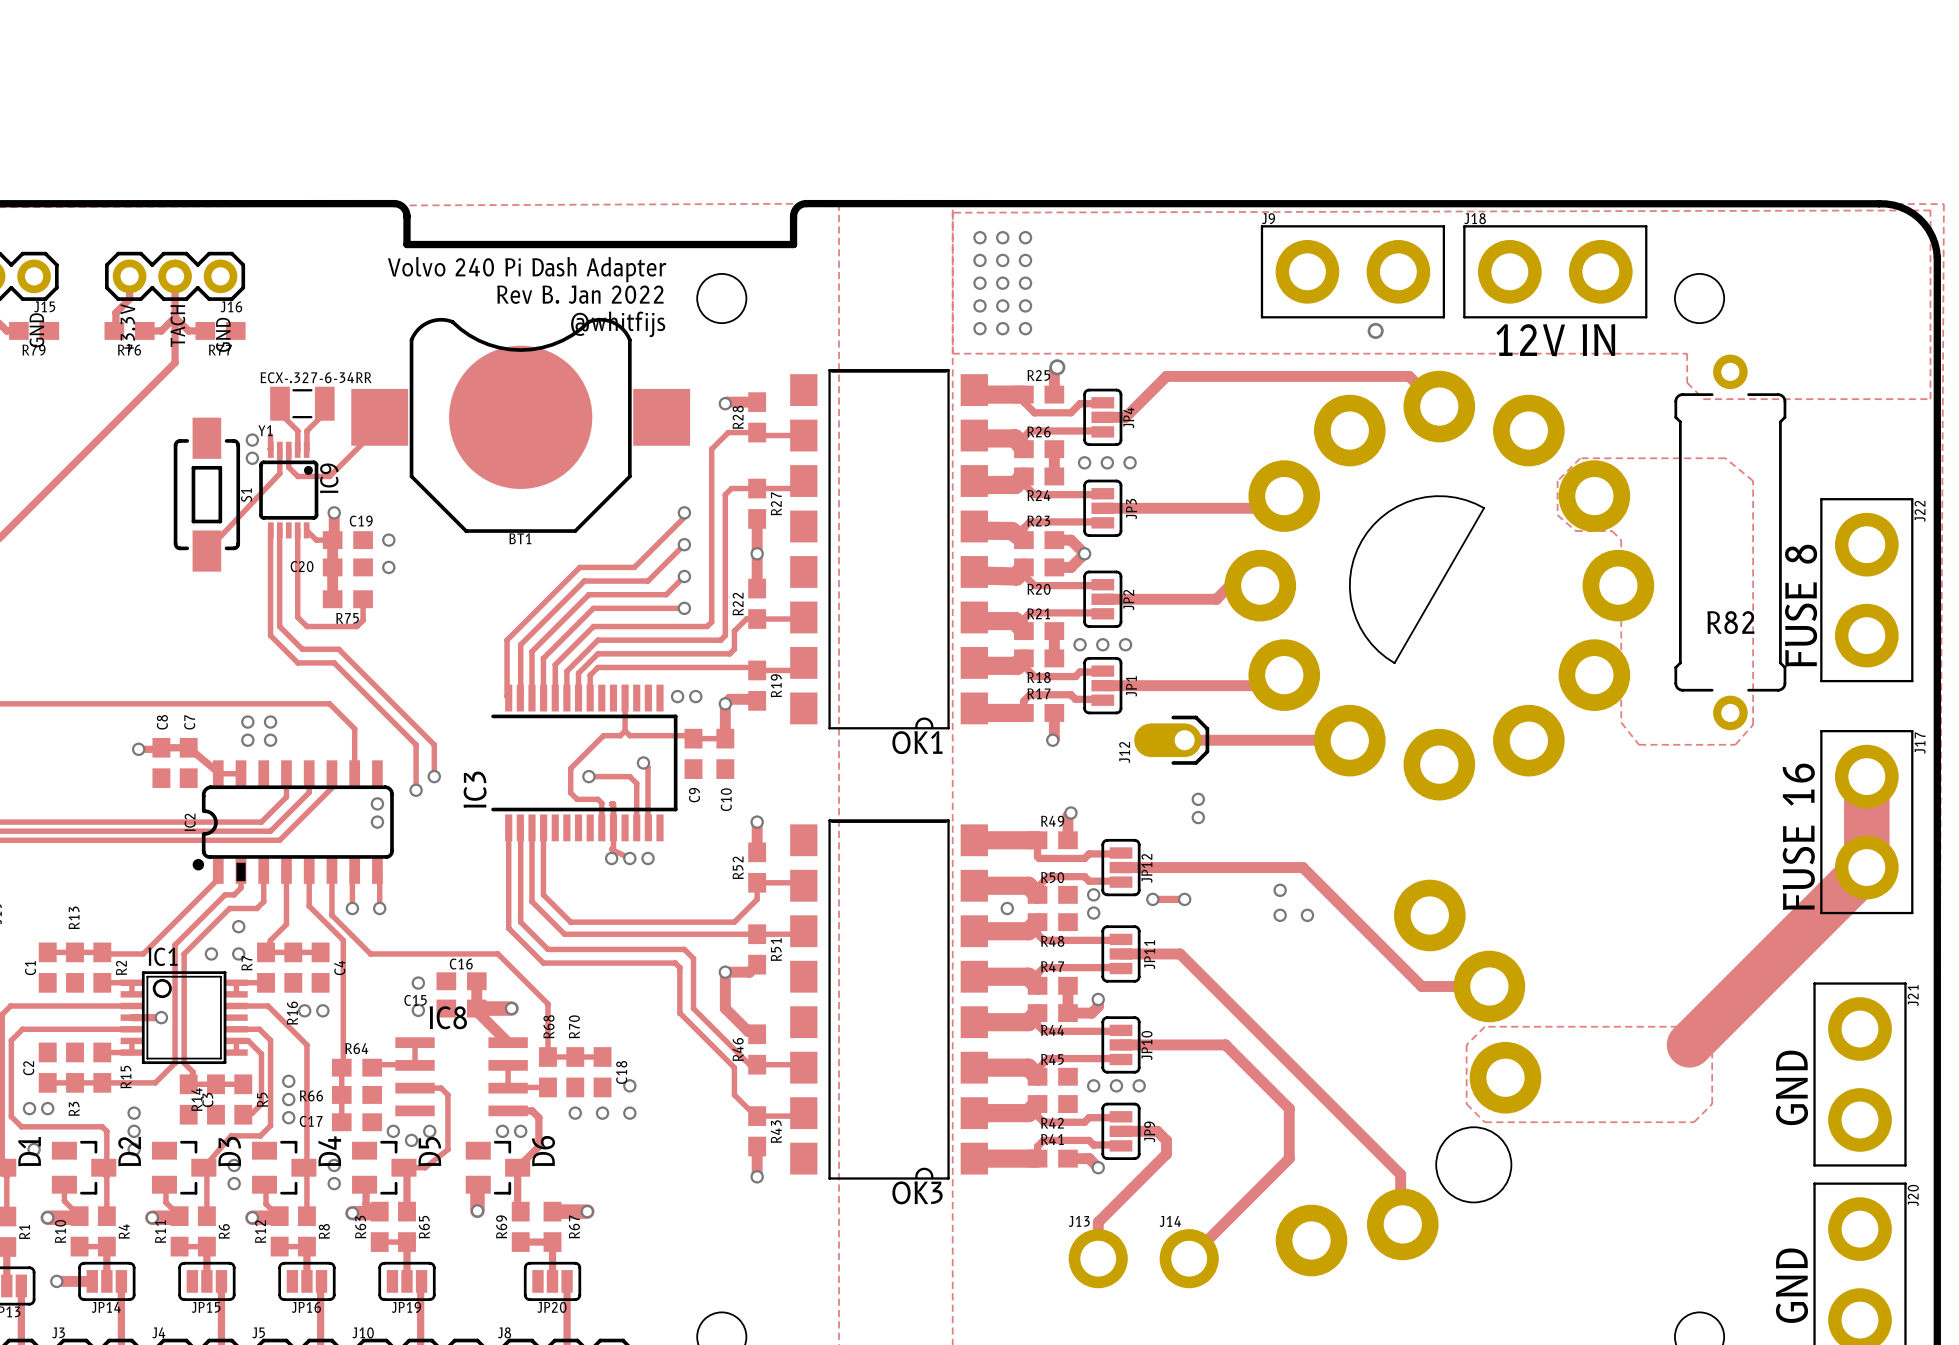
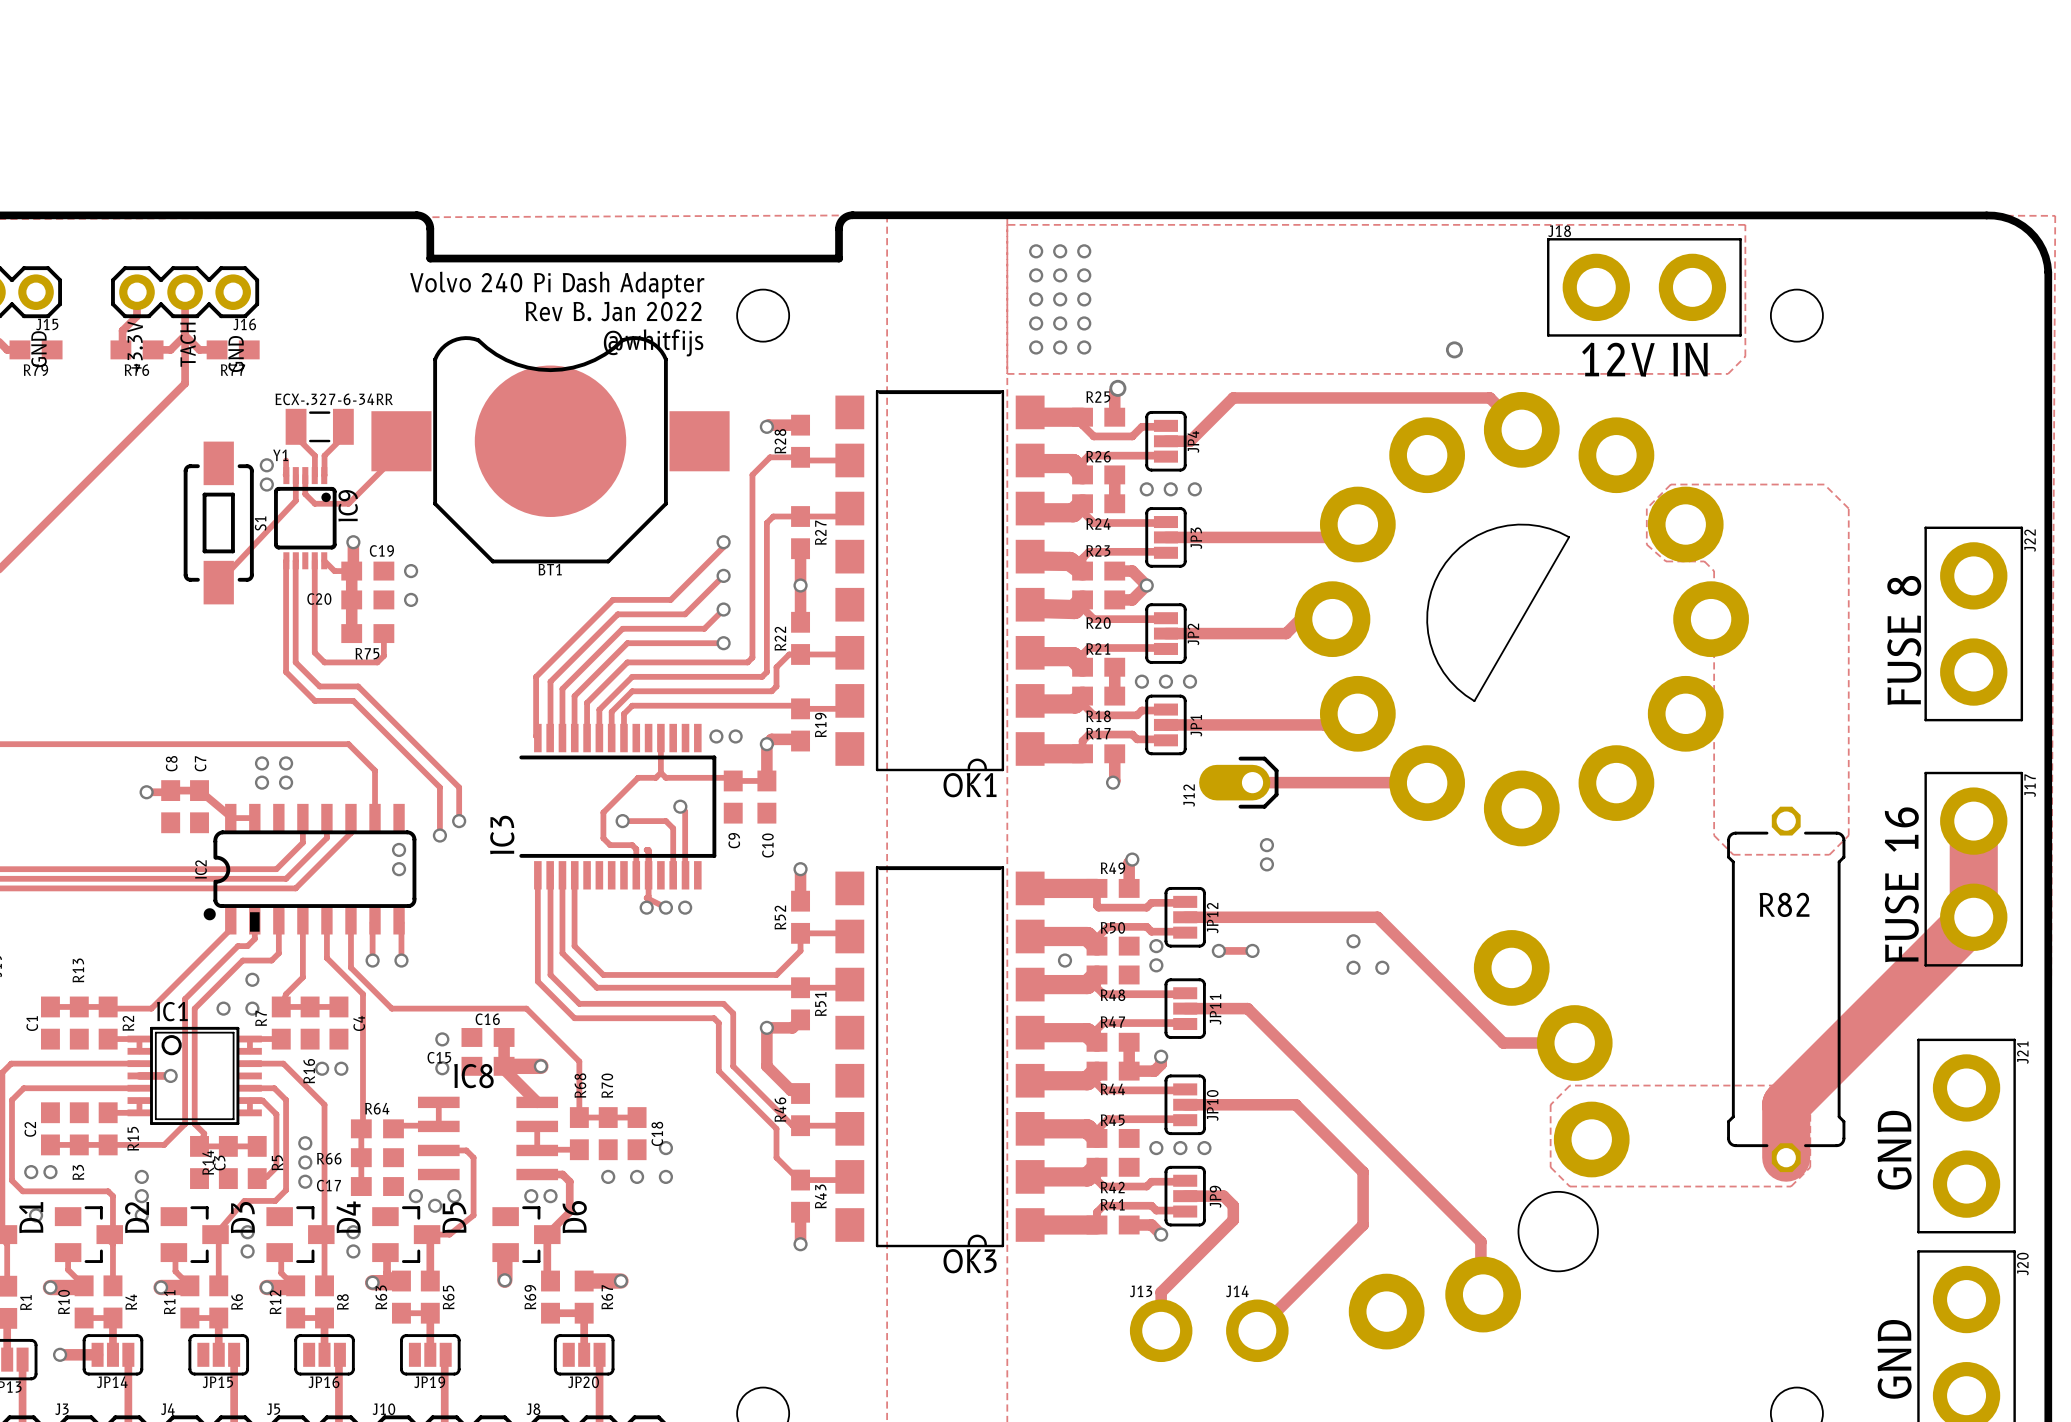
zone outline: (952, 212) (1930, 210) (1930, 399) (1703, 399) (1687, 382) (1687, 353) (1634, 353) -> (1007, 224) (1745, 224) (1745, 356) (1728, 373)
J9: (1352, 271) -> none
R82 footprint: [1674, 354, 1787, 731] -> [1727, 806, 1846, 1173]
zone outline: (1725, 458) (1753, 481) (1753, 724) (1735, 744) (1639, 744) (1621, 722) -> (1824, 484) (1848, 508) (1848, 835) (1829, 854) (1733, 854) (1714, 835) (1714, 763)
R82 name position: R82 (1730, 622) -> R82 (1784, 904)
track: none -> (1786, 1104) (1786, 1157)

